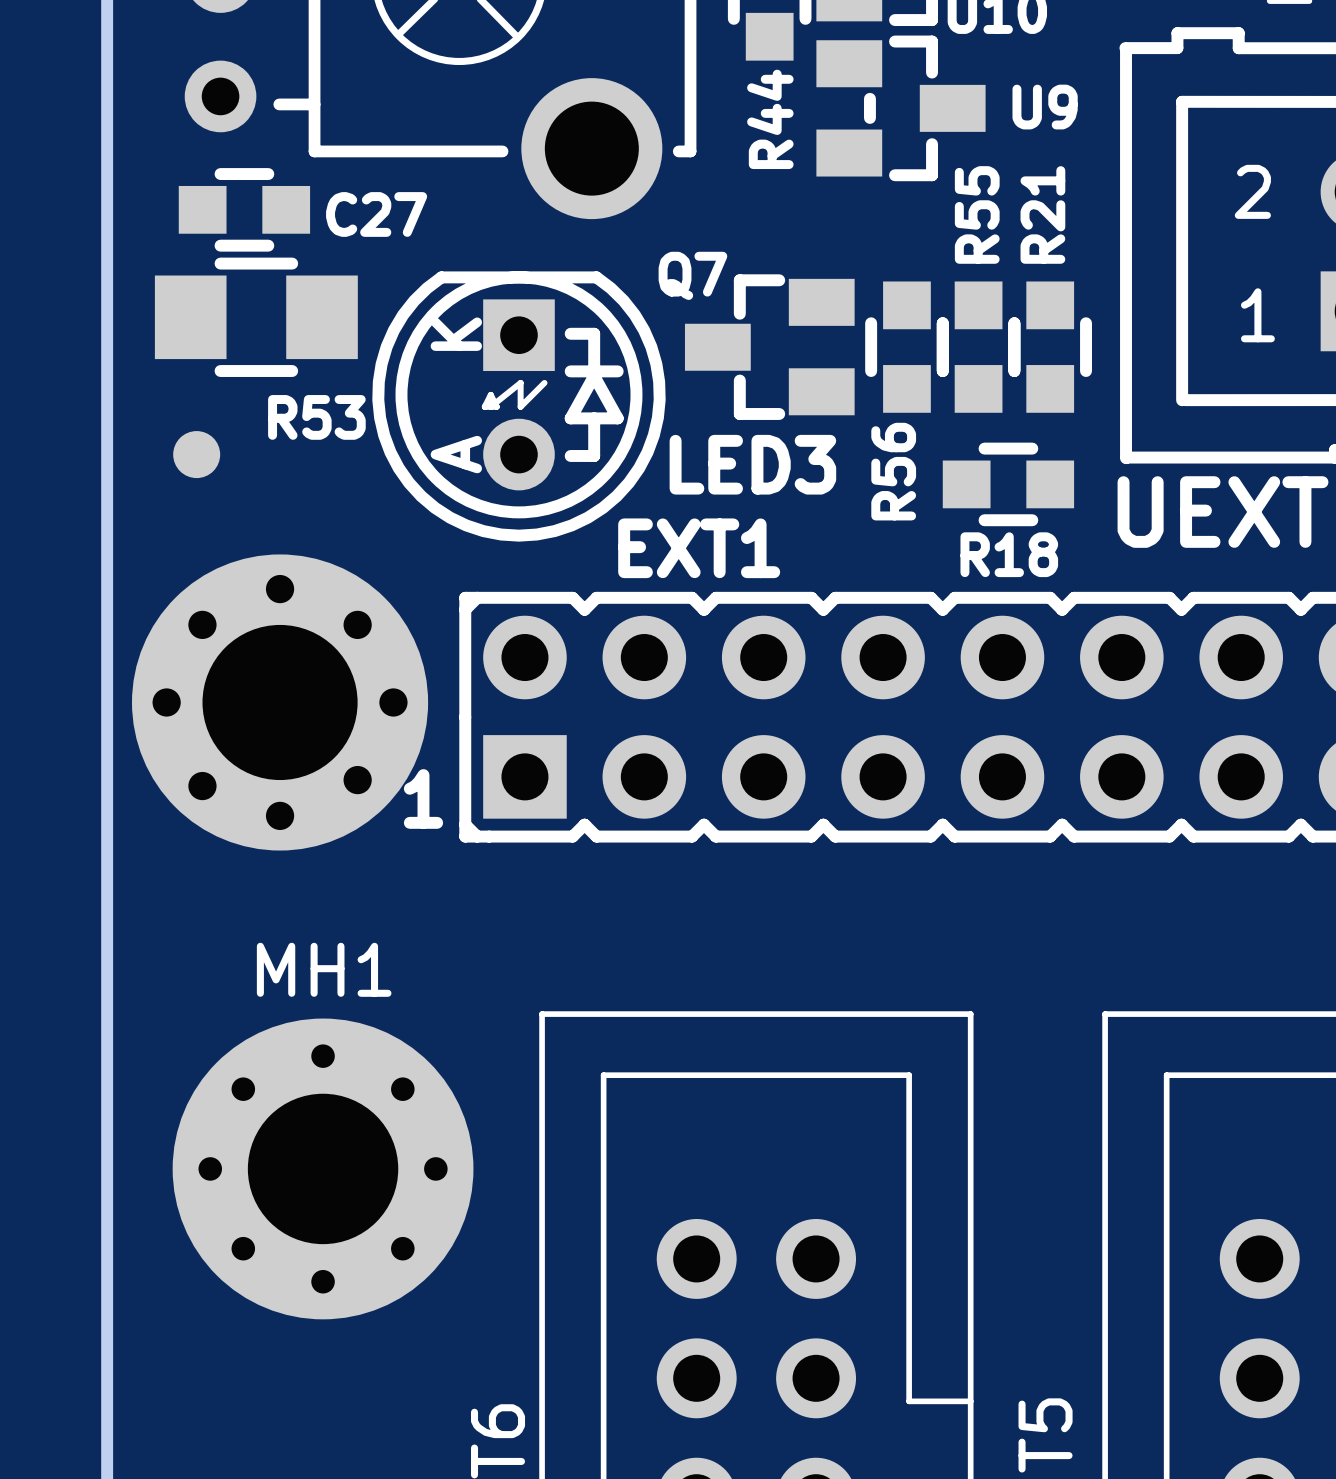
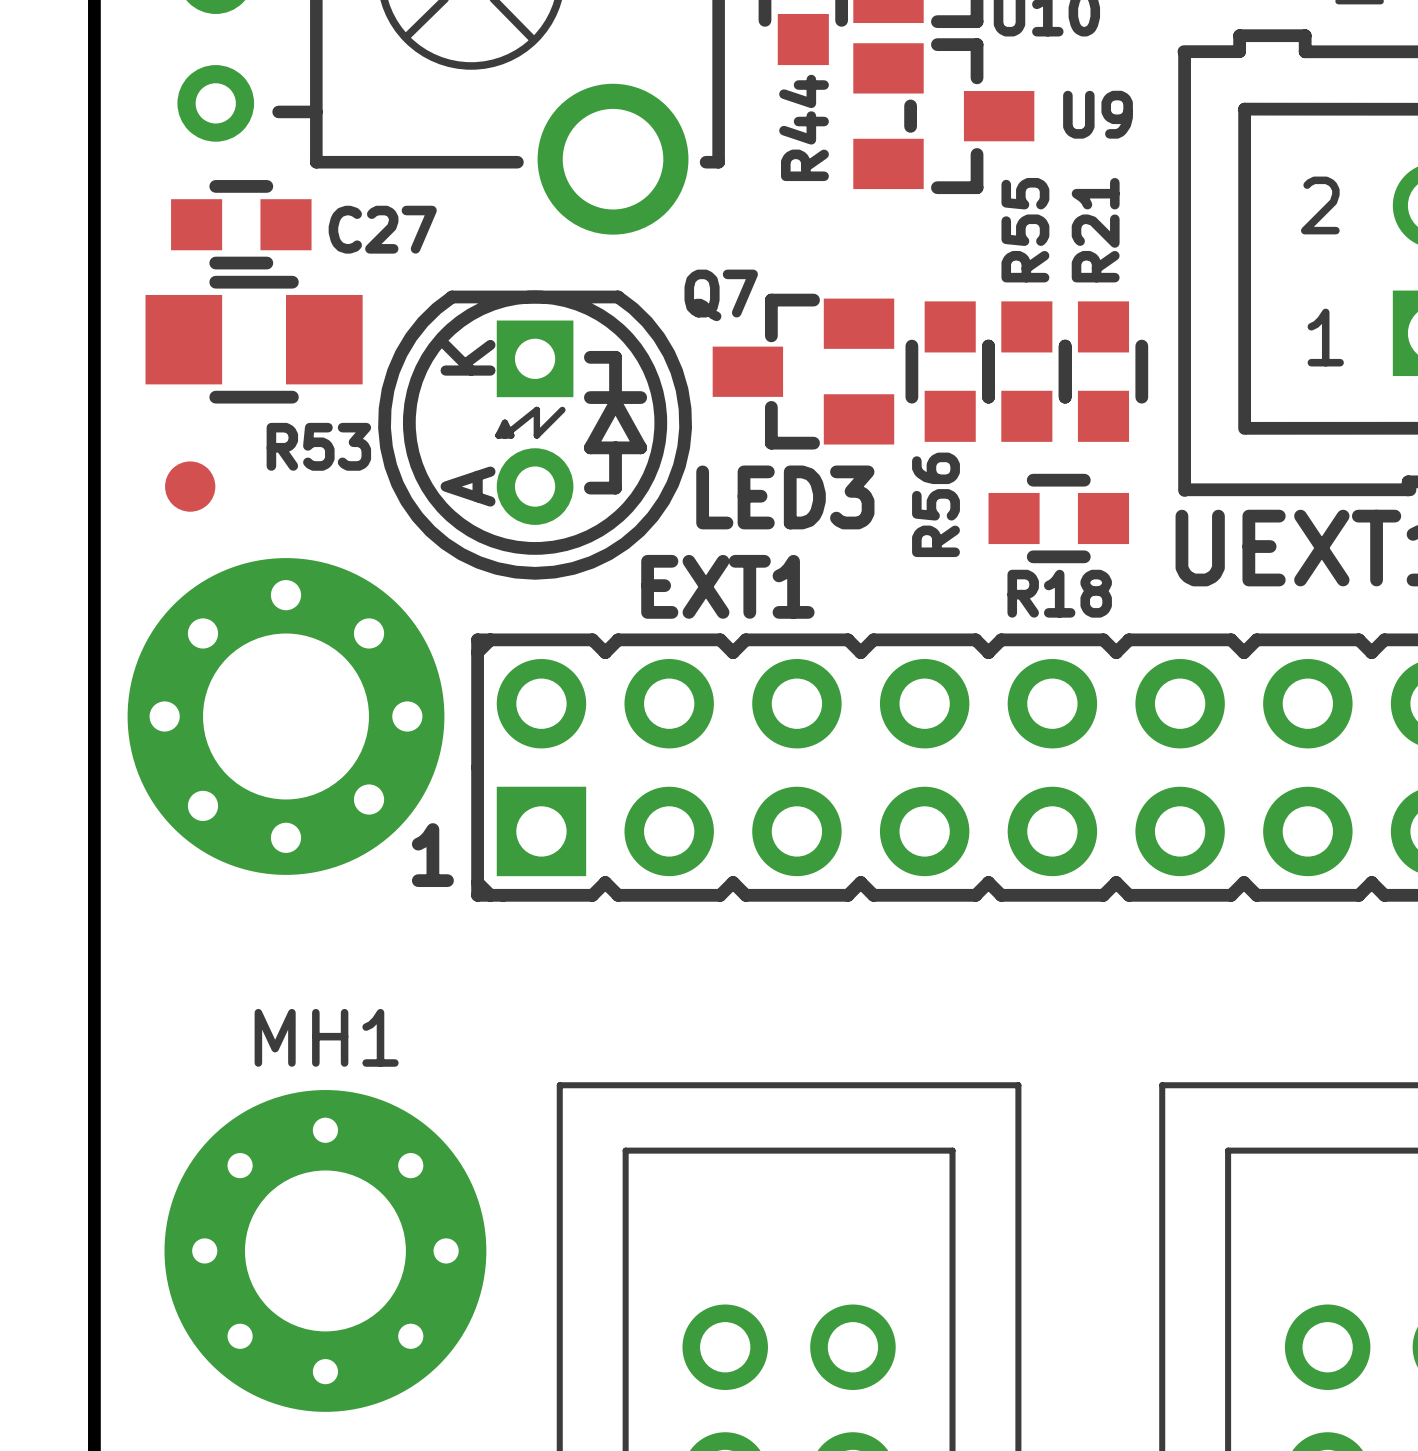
part position: (280, 702) -> (286, 716)

